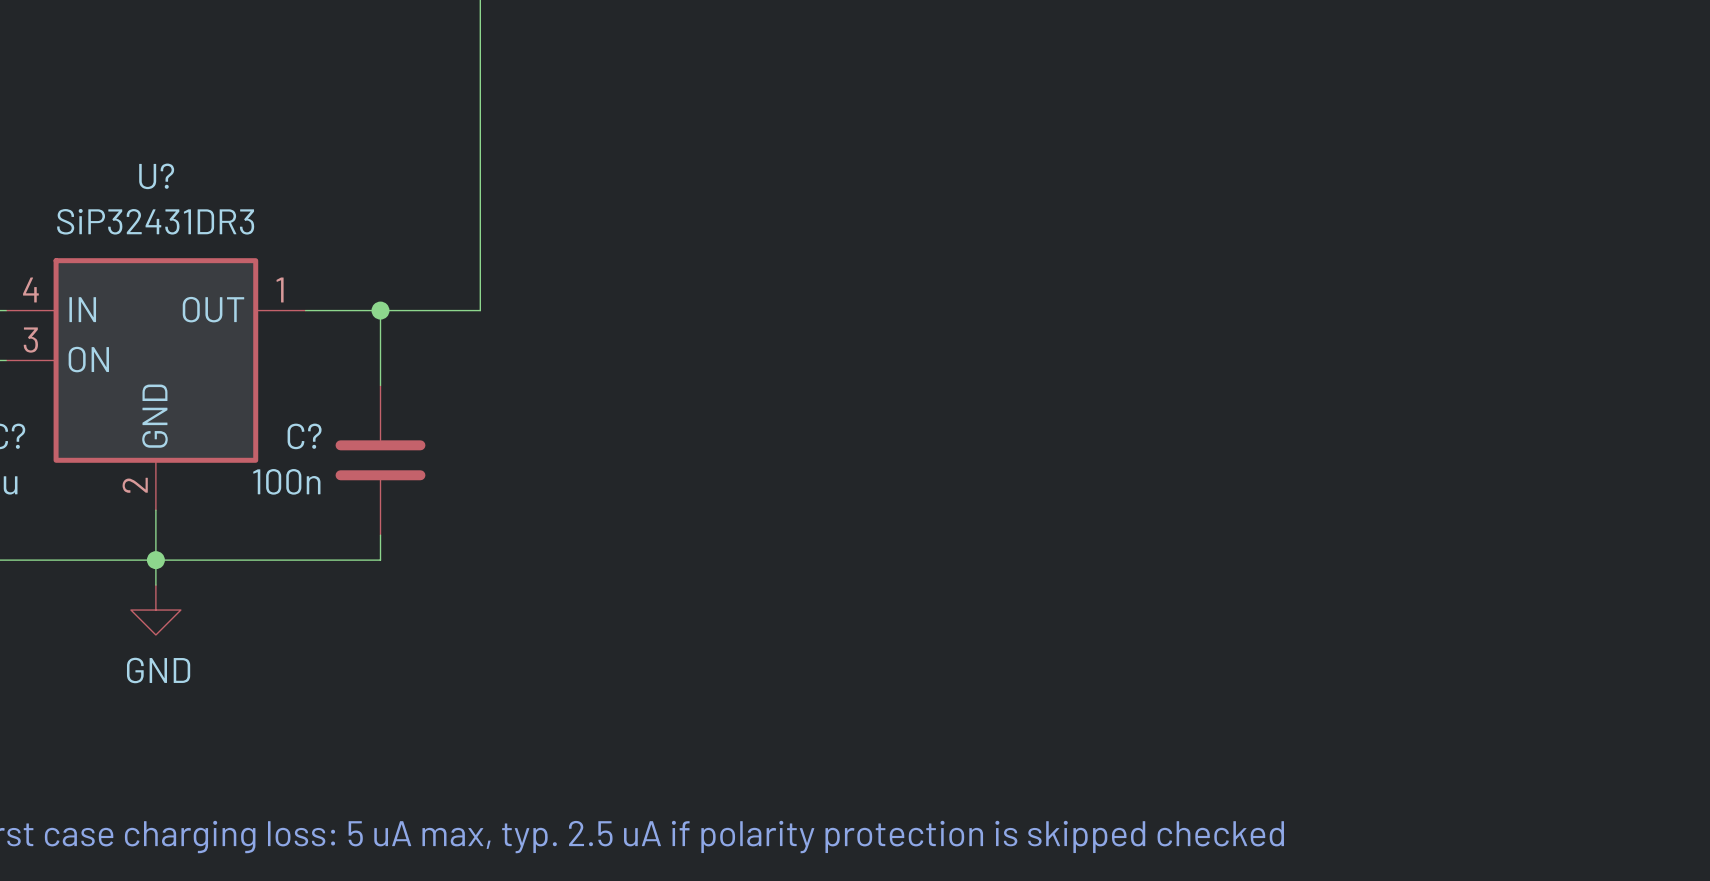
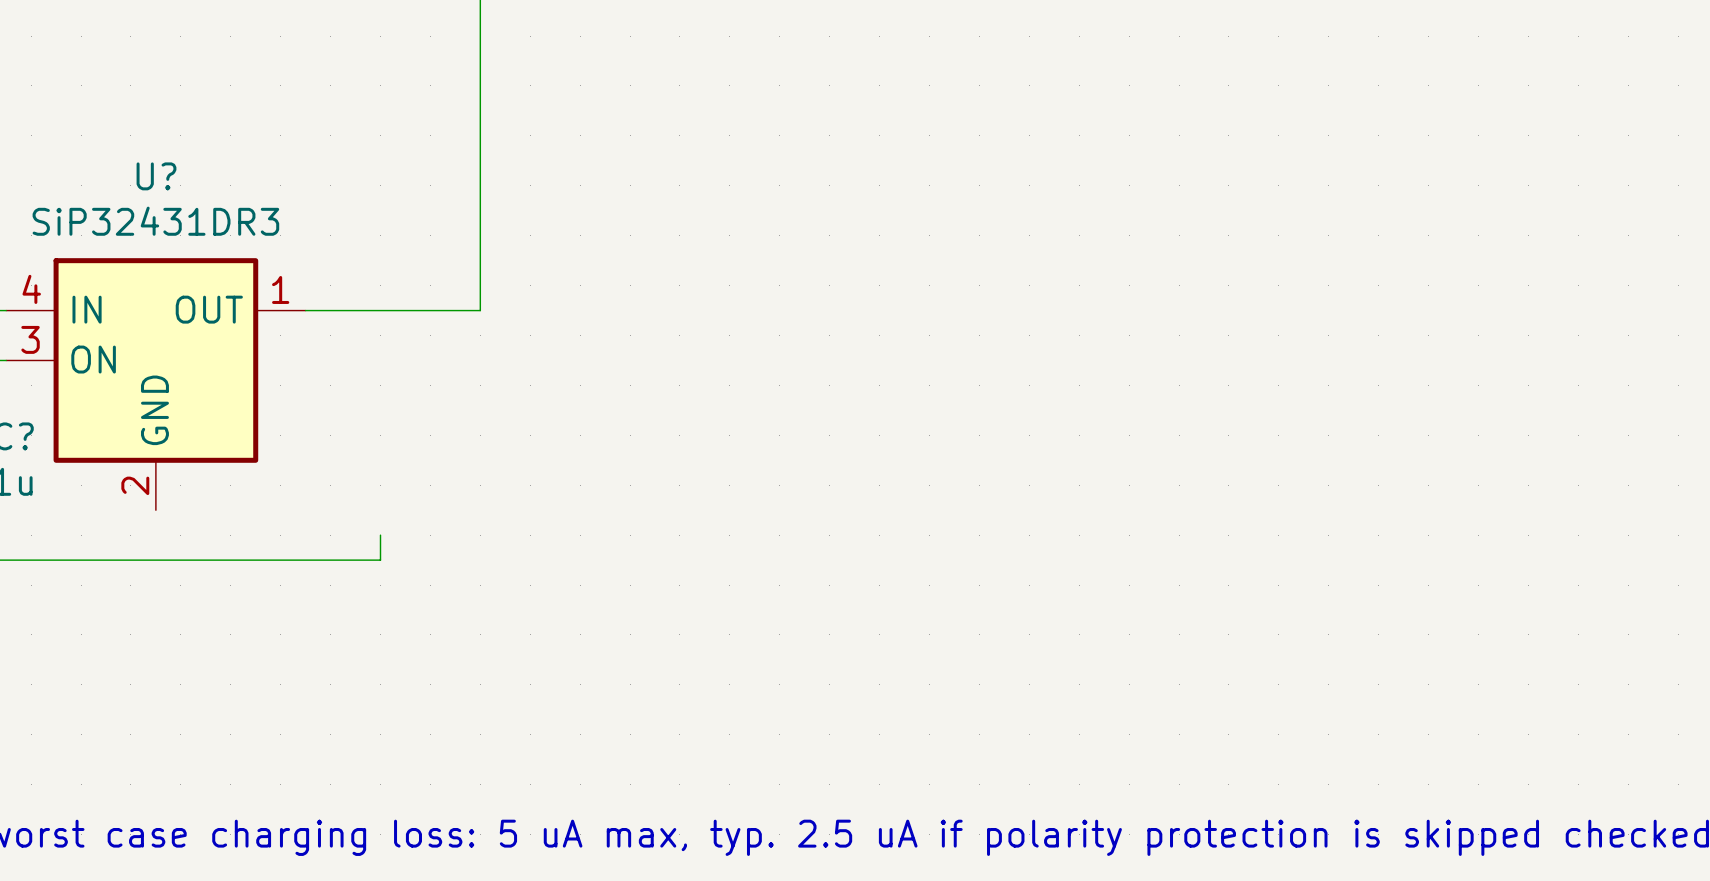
wire: (380, 310) (380, 385) -> none
junction: (380, 310) -> none
C?: 100n (380, 460) -> none
wire: (155, 510) (155, 585) -> none
junction: (155, 560) -> none
power symbol: GND (155, 610) -> none

